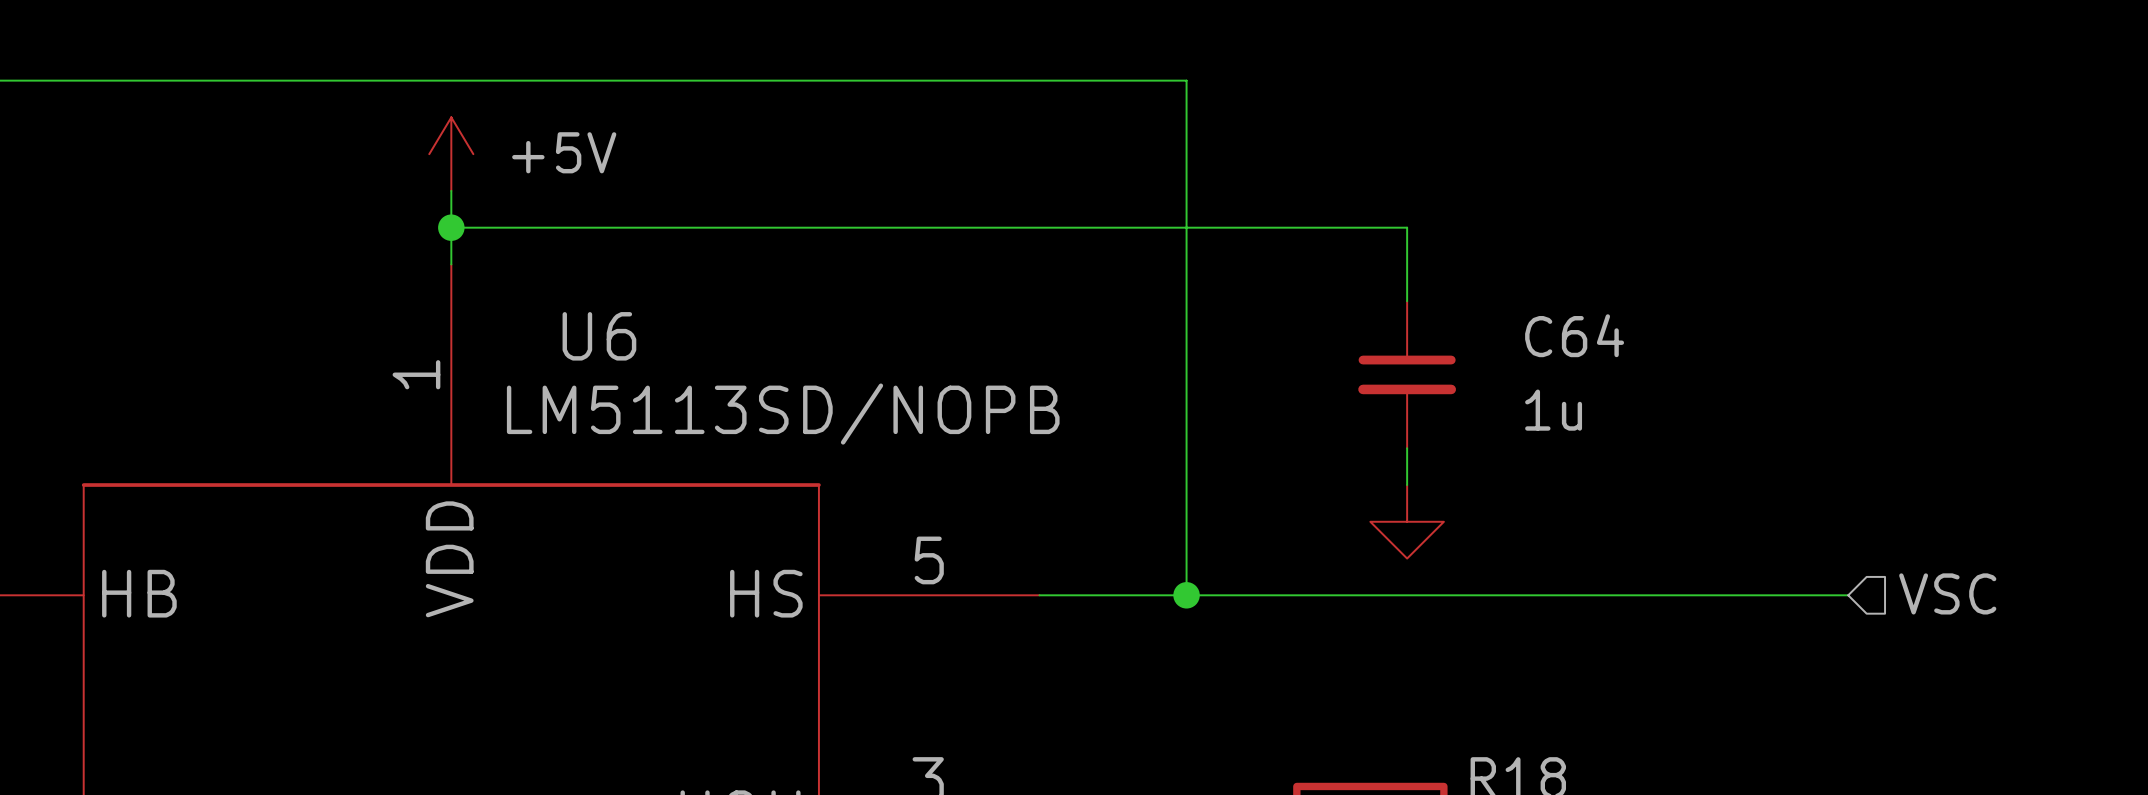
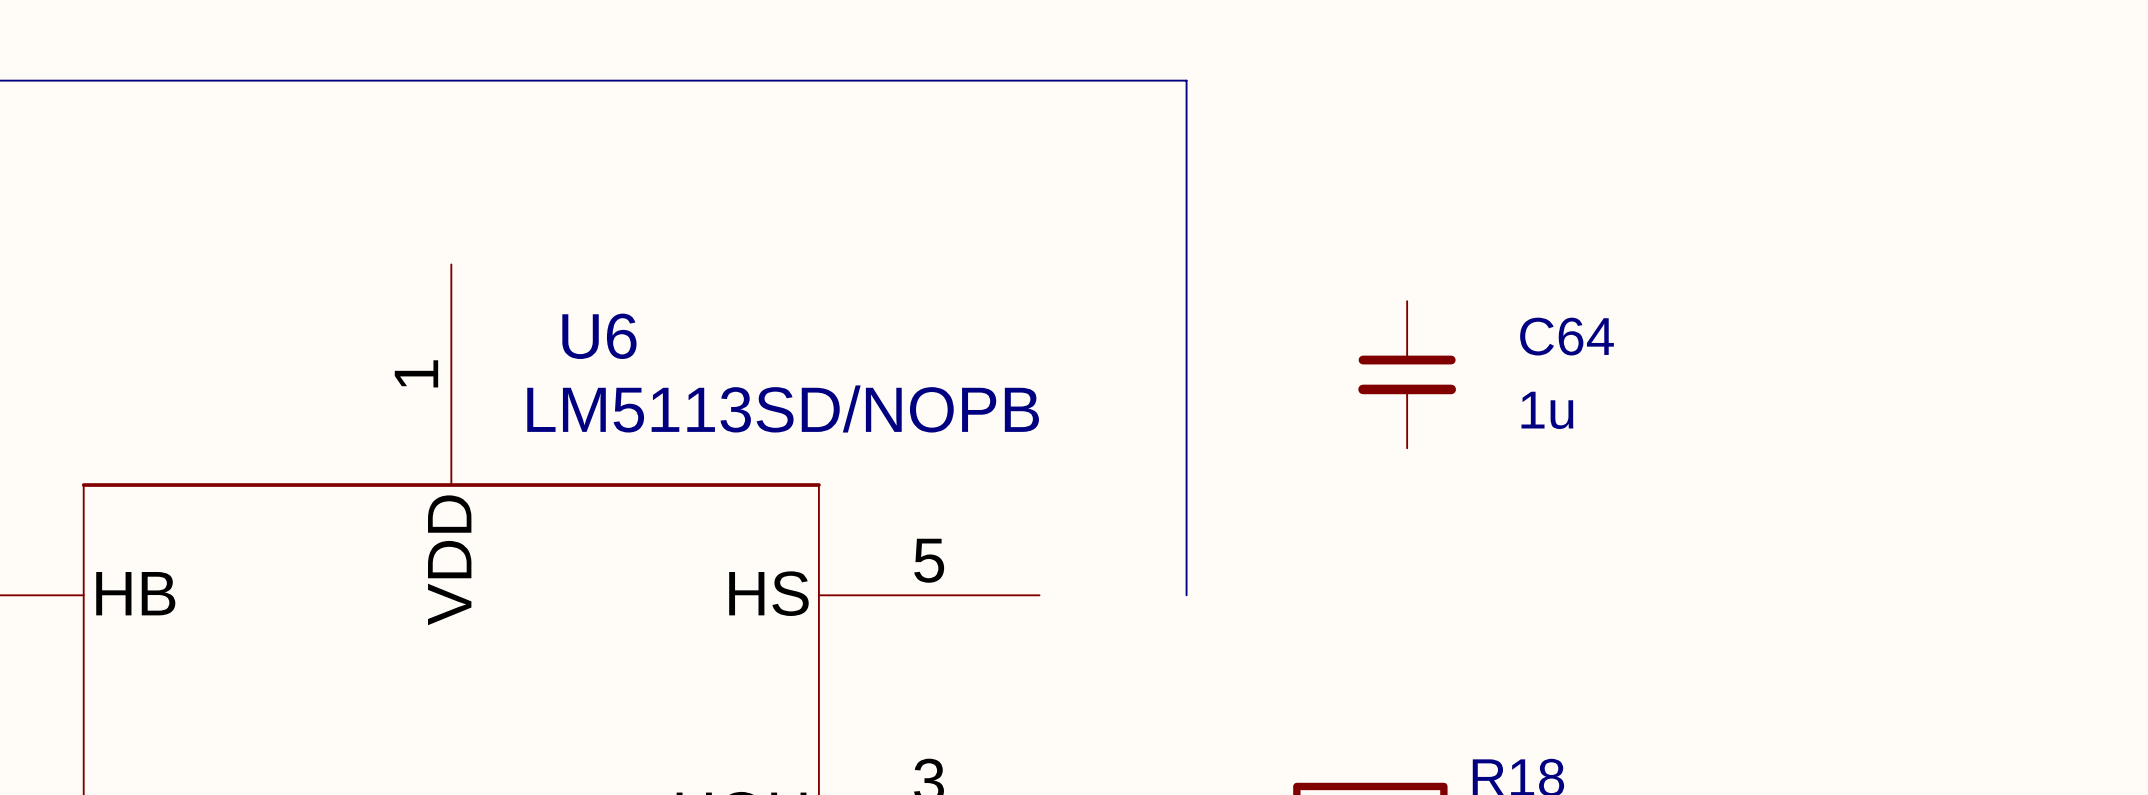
power symbol: +5V (451, 154) -> none
wire: (451, 190) (451, 264) -> none
wire: (451, 227) (1407, 227) (1407, 301) -> none
junction: (451, 227) -> none
wire: (1407, 448) (1407, 485) -> none
power symbol: (1407, 521) -> none
hierarchical label: VSC (1947, 593) -> none
wire: (1039, 595) (1848, 595) -> none
junction: (1186, 595) -> none

